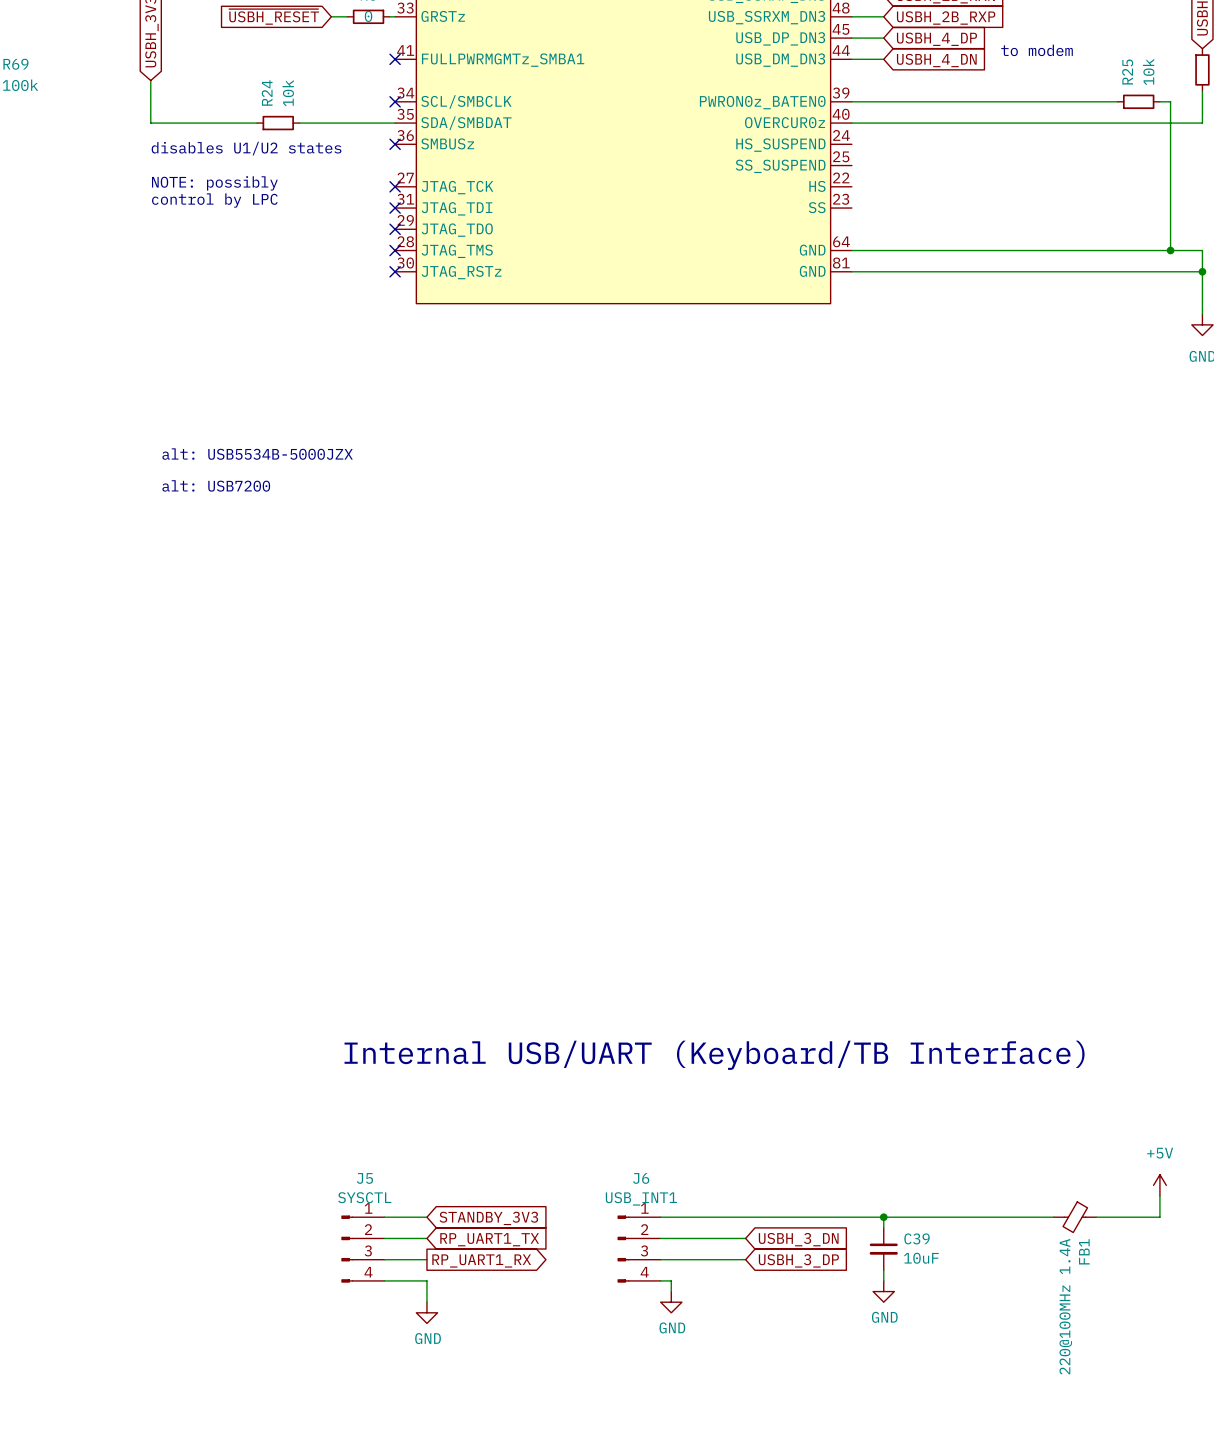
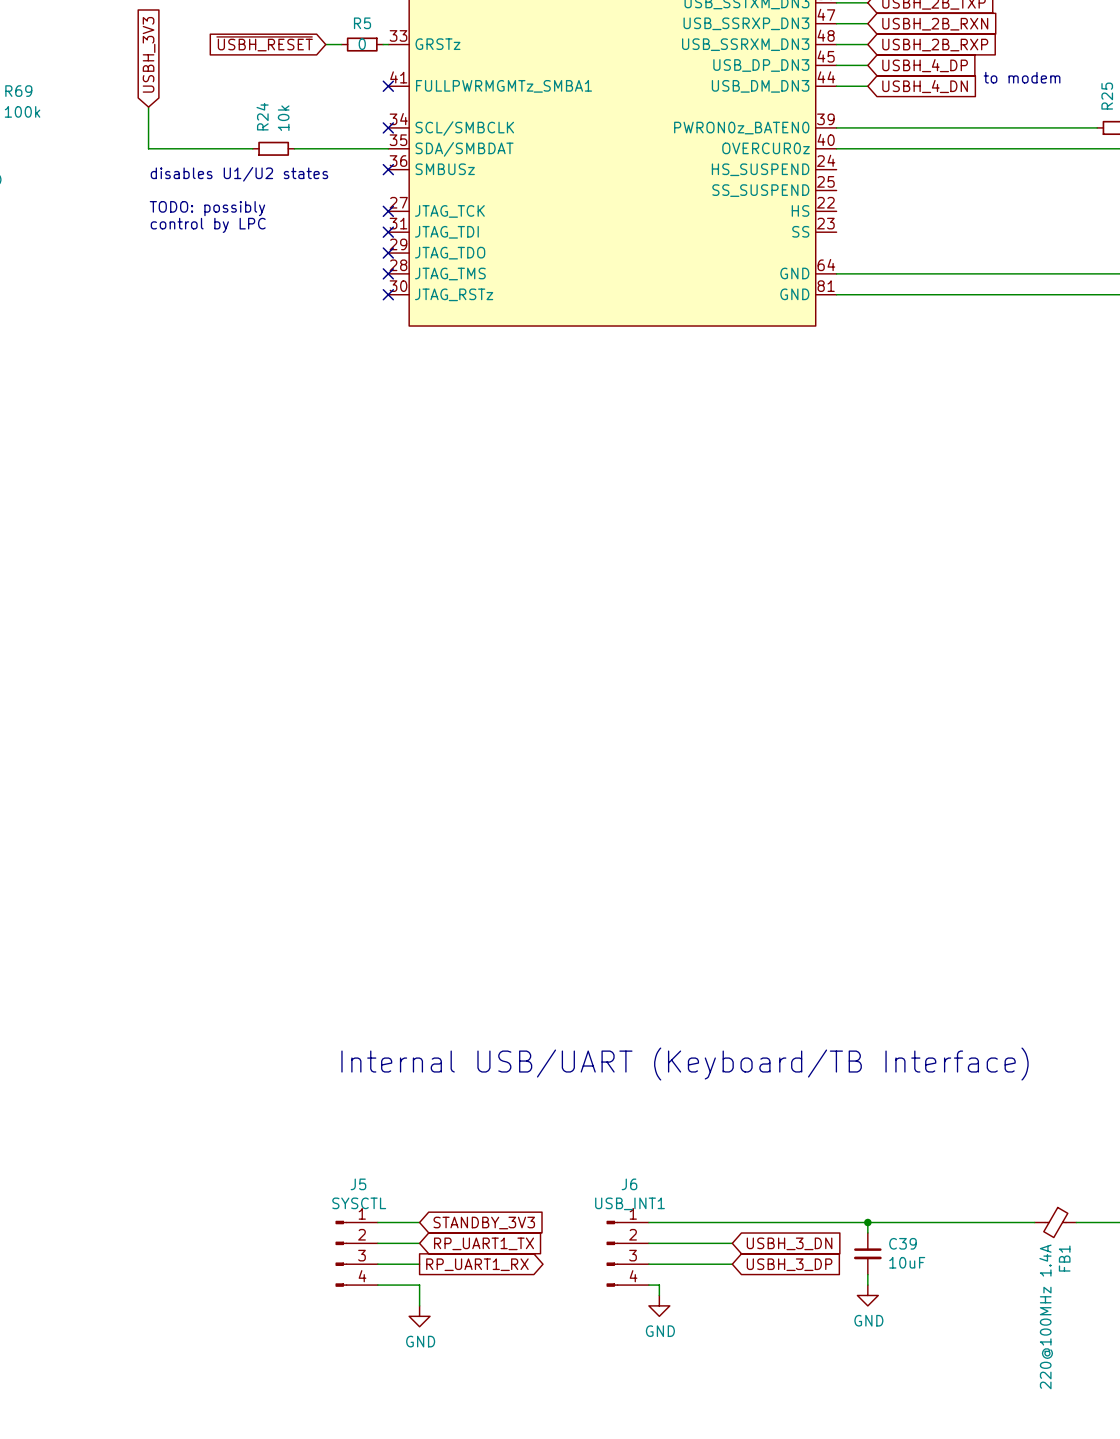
text: NOTE: possibly (214, 183) -> TODO: possibly (207, 208)
text: alt: USB5534B-5000JZX (257, 454) -> none
text: alt: USB7200 (216, 485) -> none

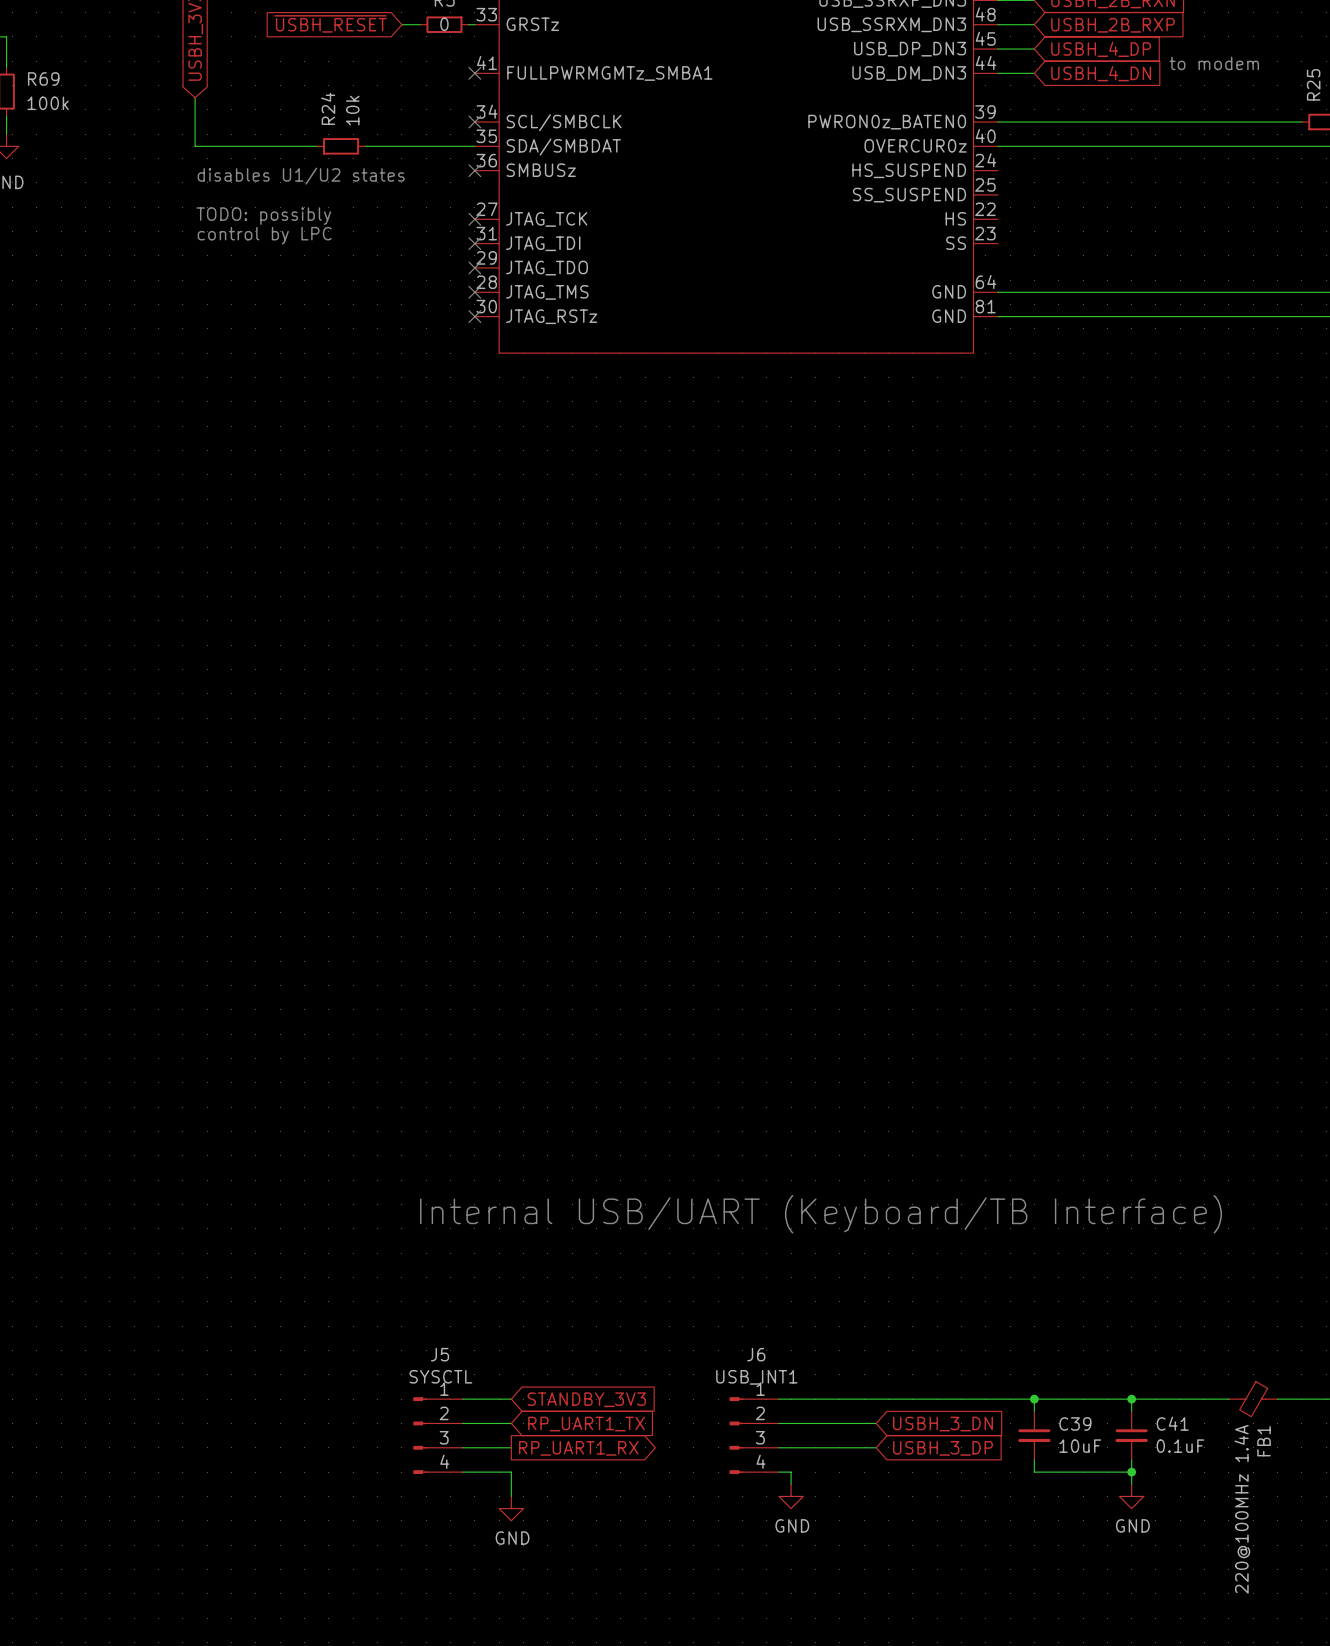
wire: none -> (1131, 1399) (1131, 1411)
junction: none -> (1131, 1399)
C41: none -> 0.1uF (1131, 1435)
wire: none -> (1131, 1459) (1131, 1484)
wire: none -> (1034, 1472) (1131, 1472)
junction: none -> (1131, 1472)
power symbol position: GND (867, 1295) -> GND (1131, 1496)

